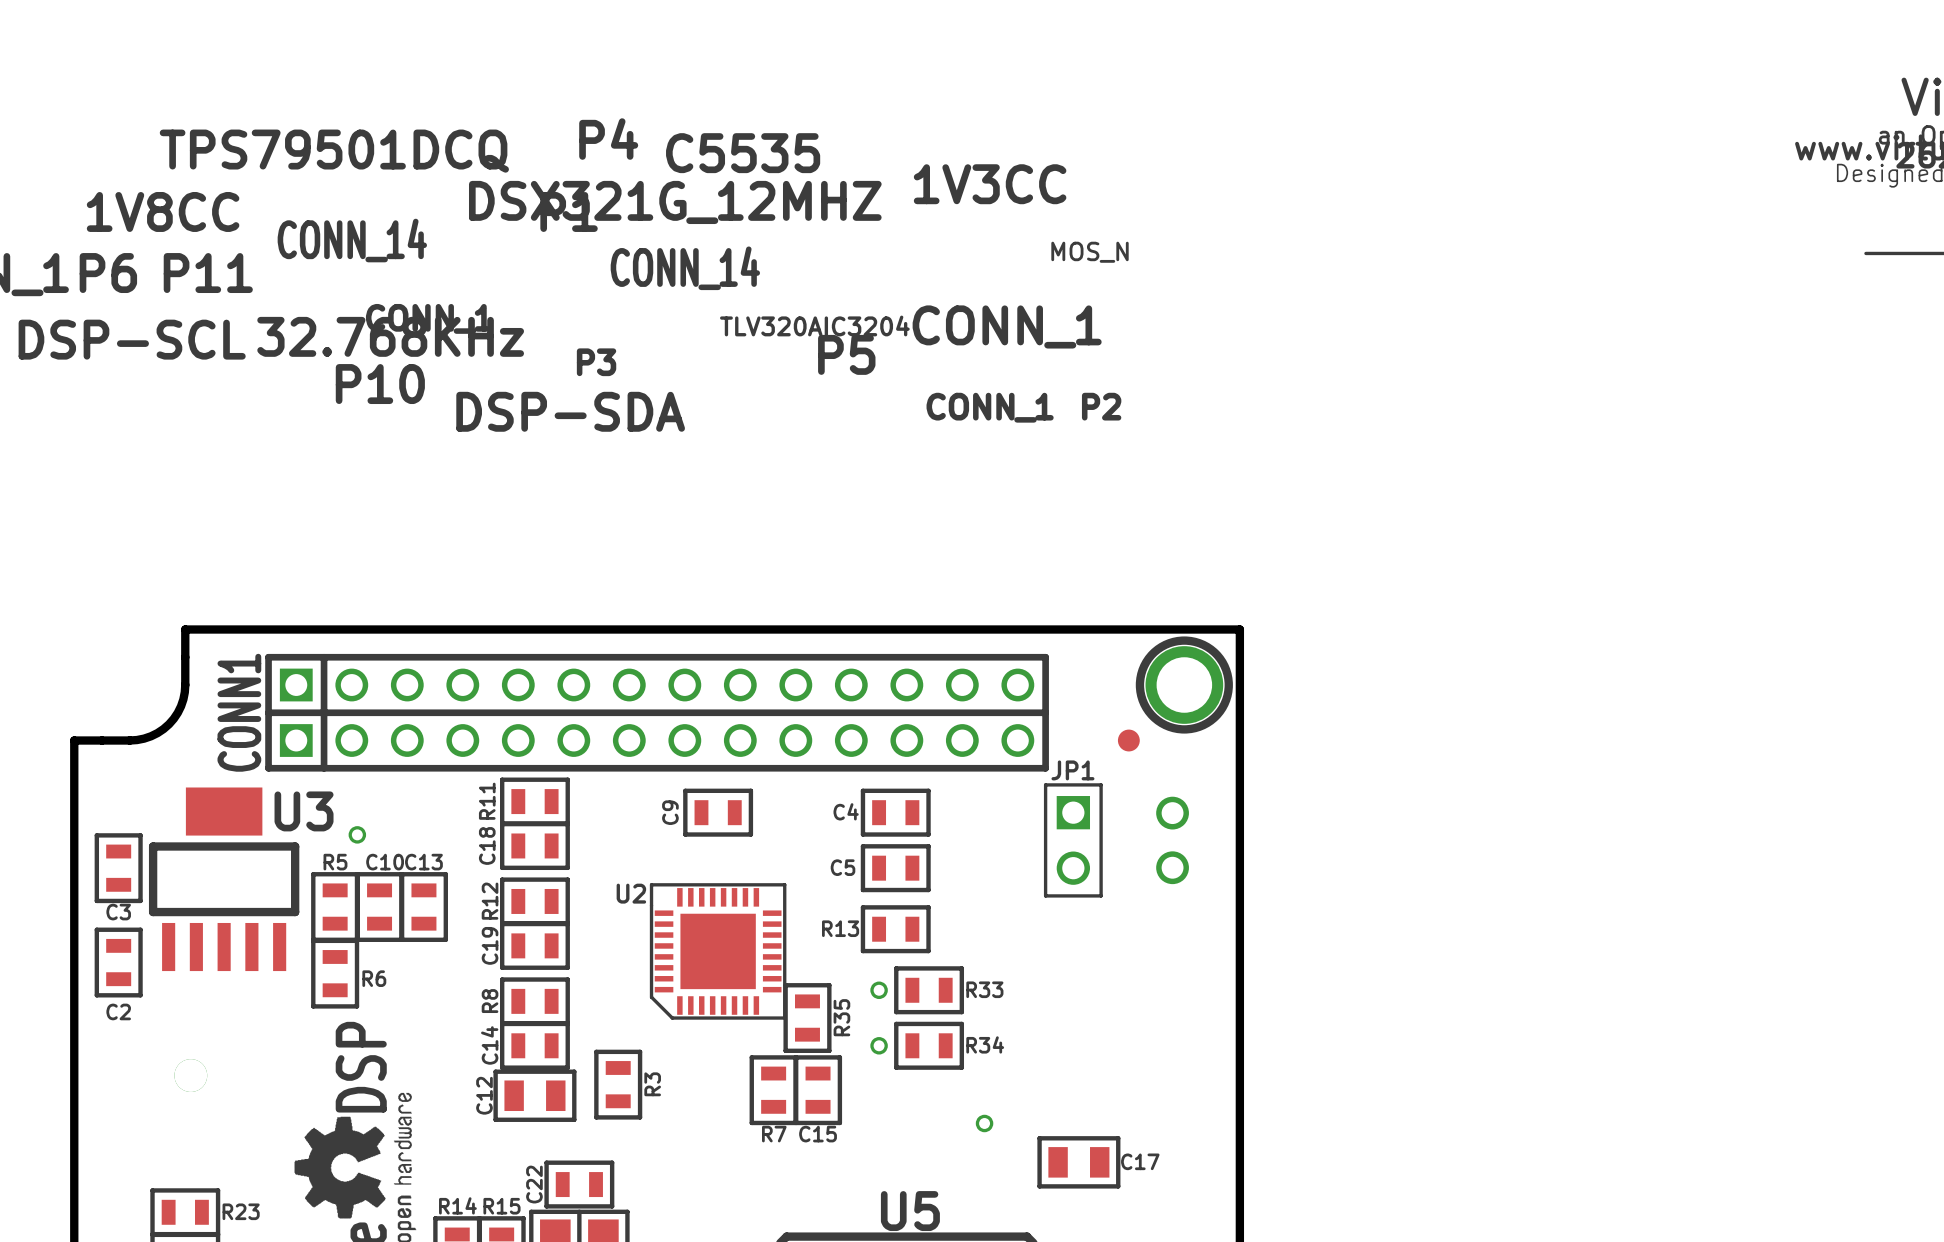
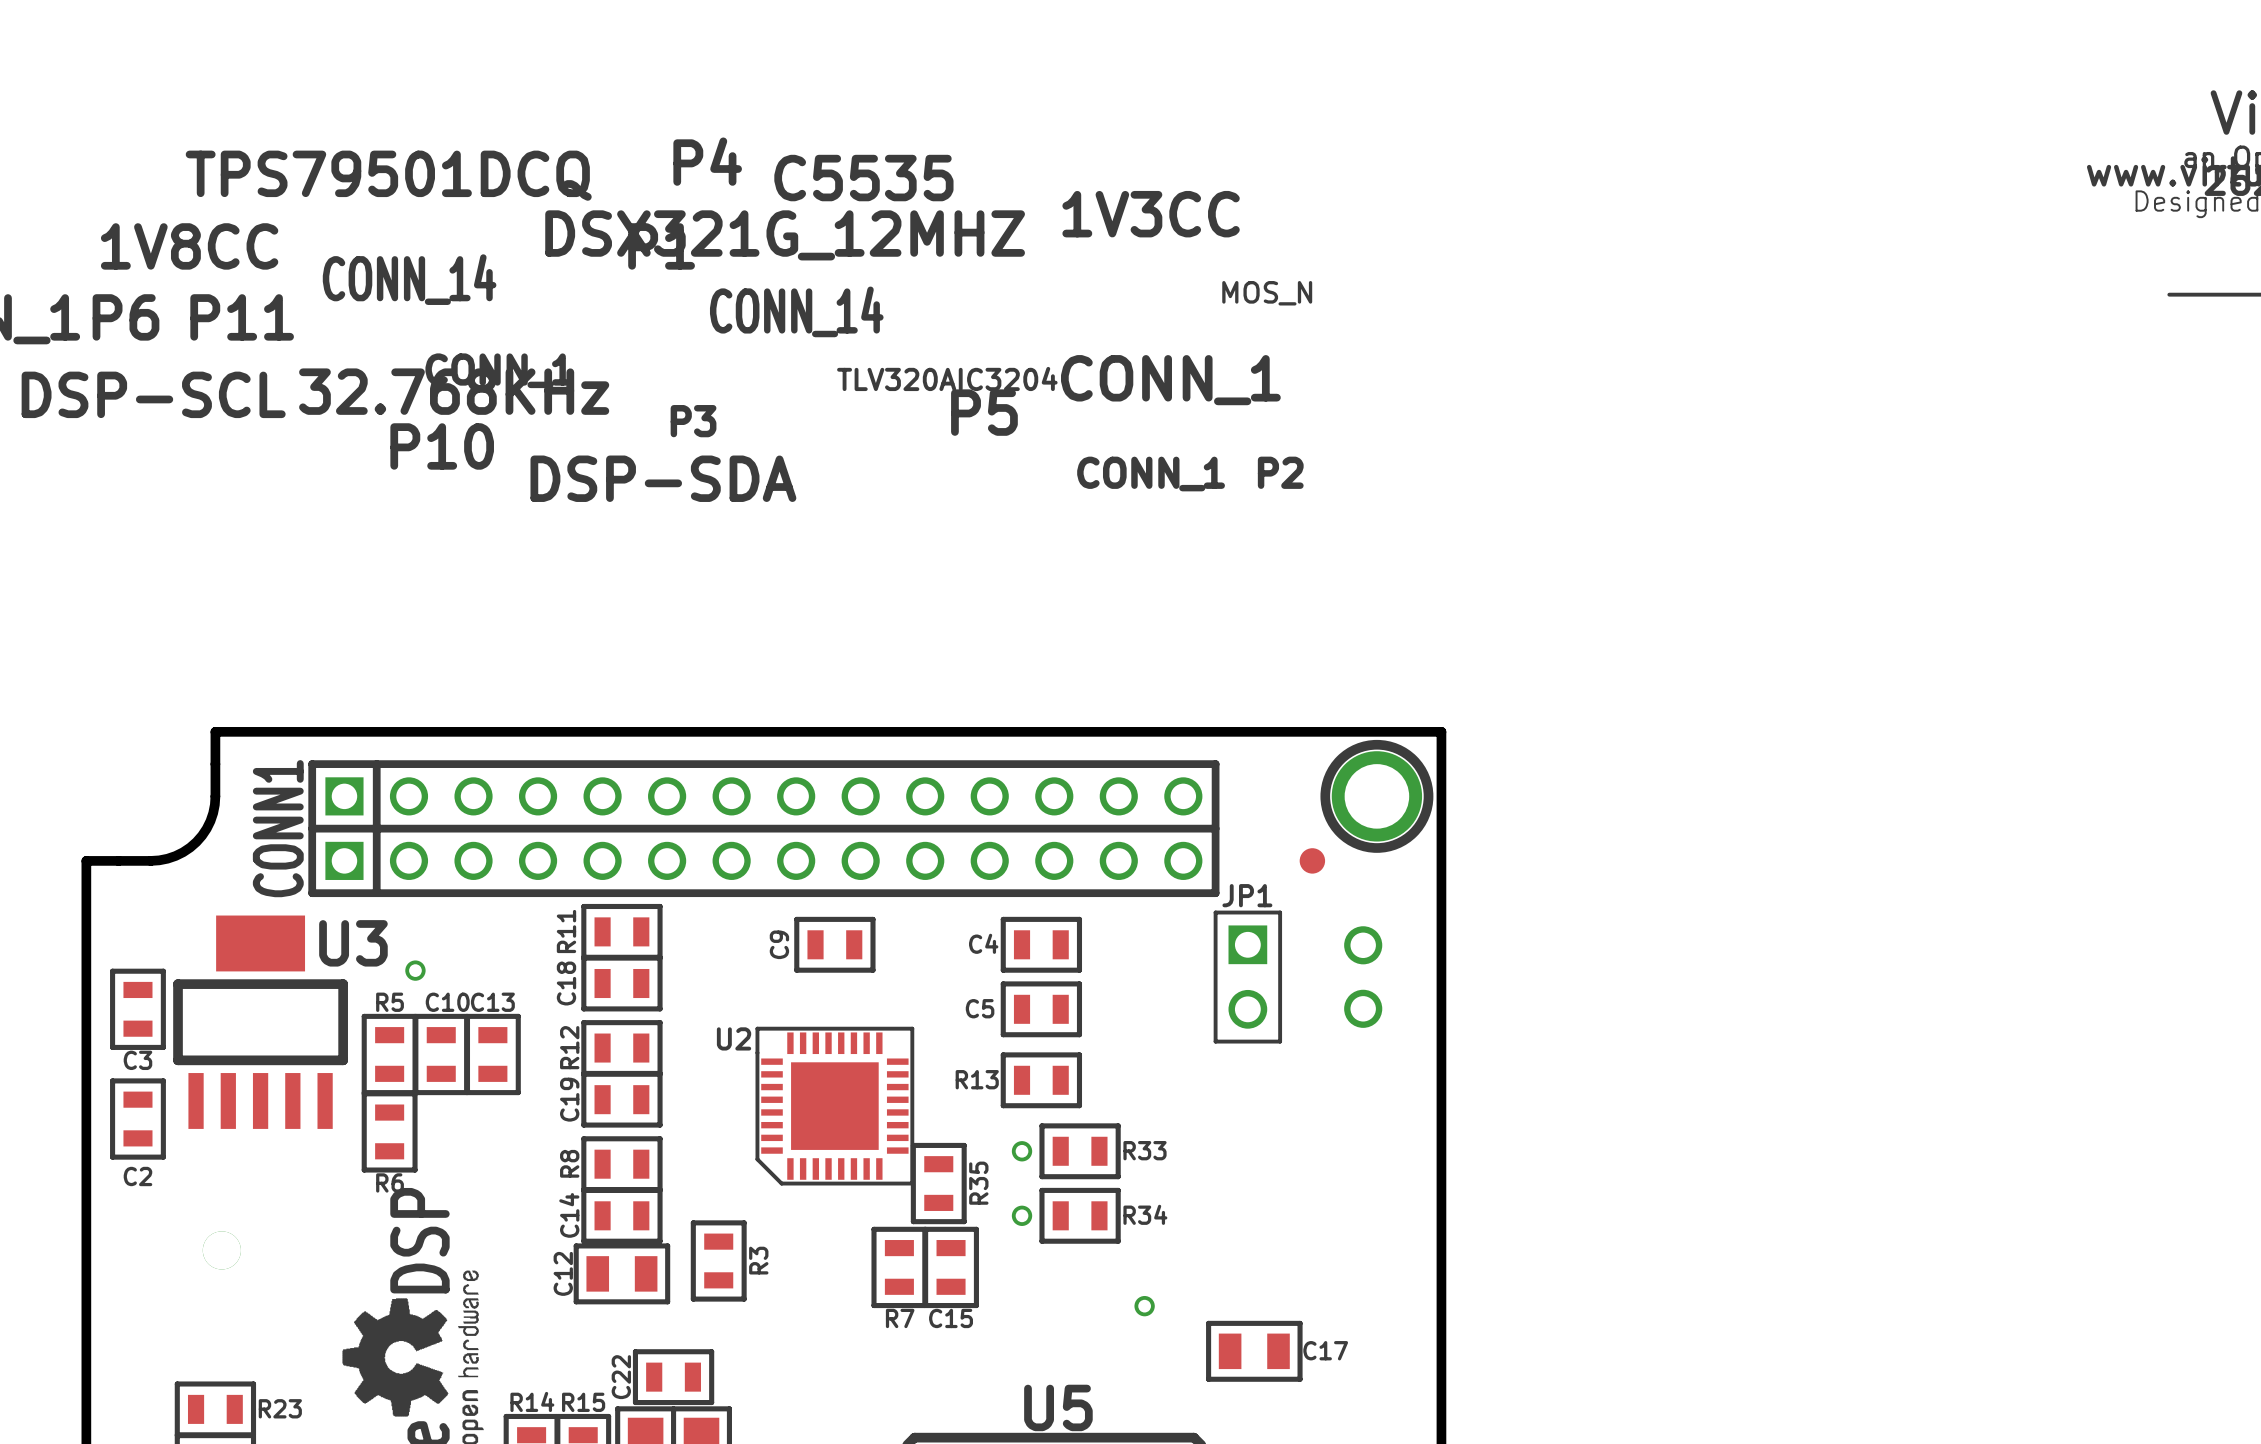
R6 name position: R6 (374, 978) -> R6 (390, 1182)

